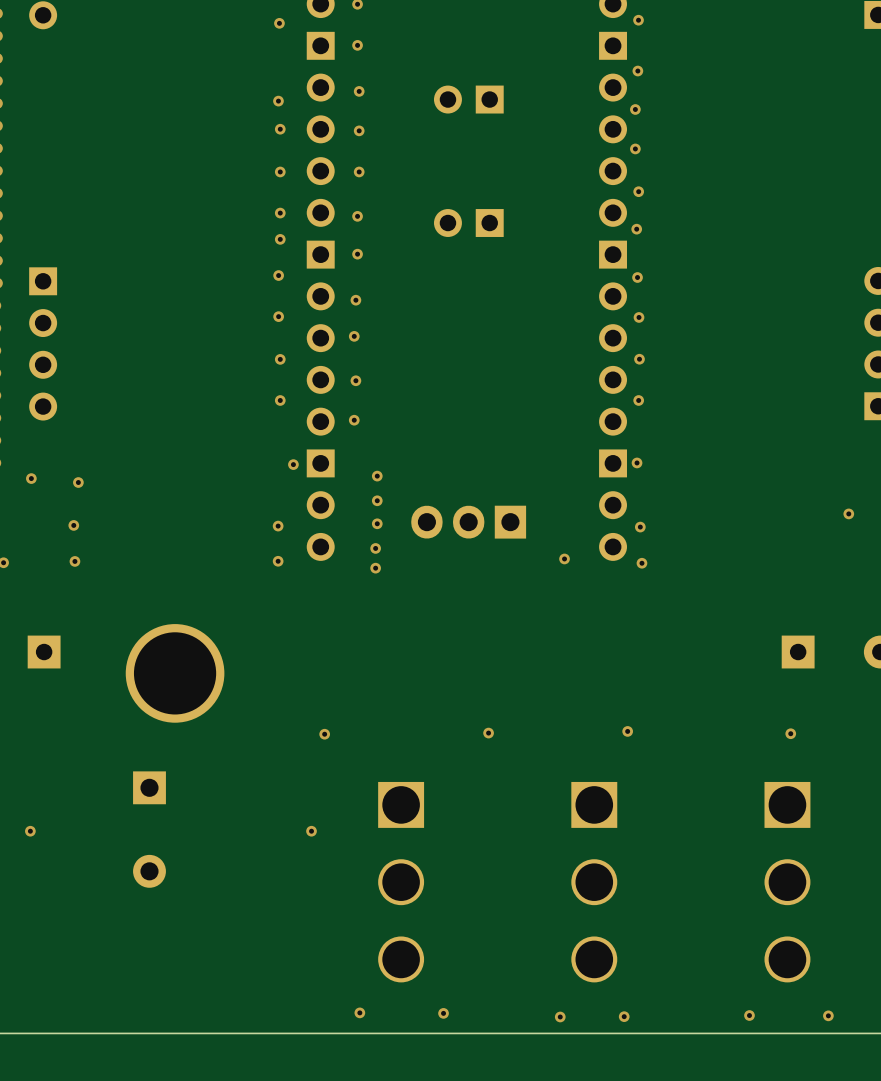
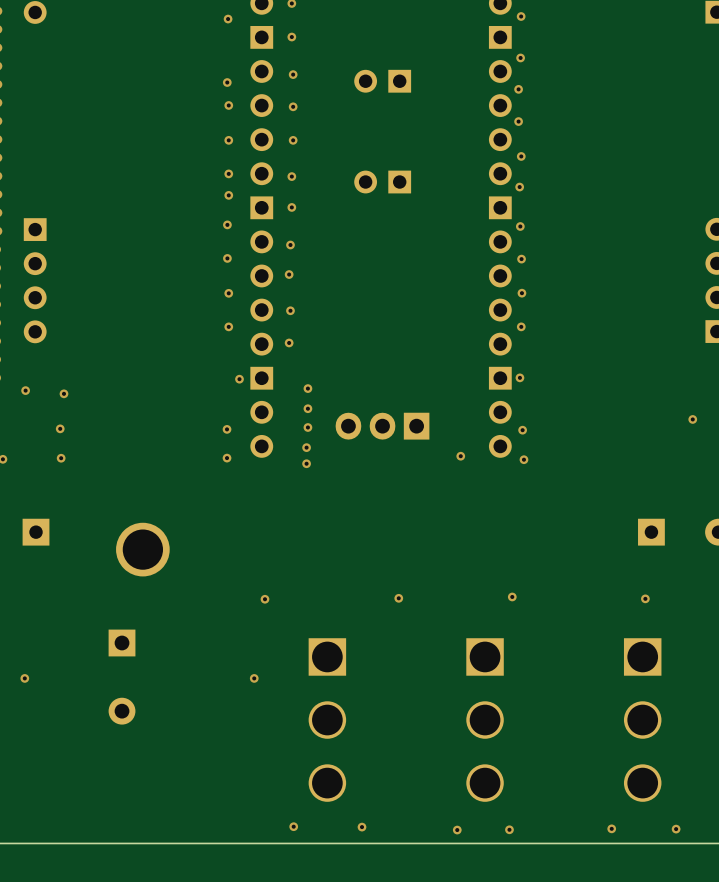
part footprint: [125, 624, 225, 723] -> [116, 522, 170, 577]

